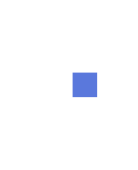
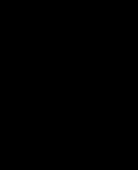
part: (84, 84) -> none

